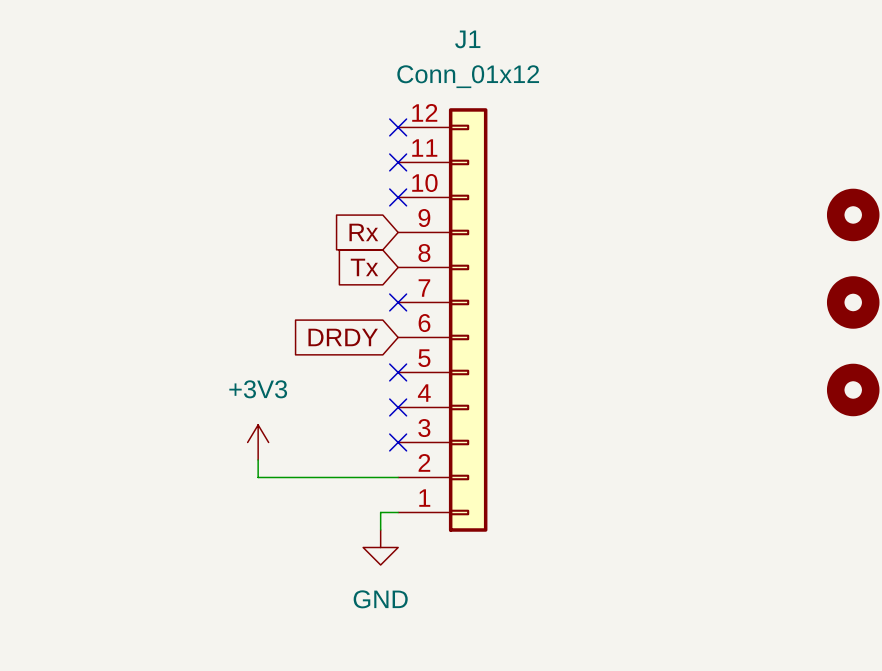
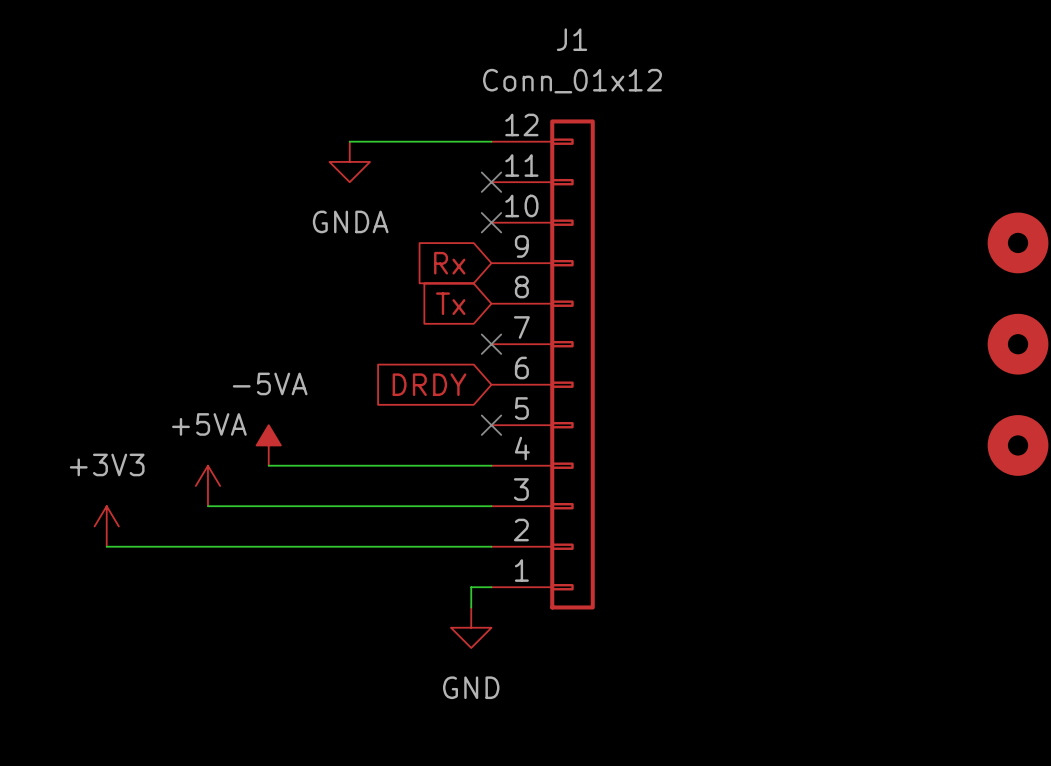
wire: none -> (349, 141) (491, 141)
no-connect mark: (398, 127) -> none
power symbol: none -> GNDA (349, 161)
power symbol: none -> -5VA (268, 445)
wire: none -> (268, 465) (491, 465)
no-connect mark: (398, 407) -> none
power symbol: none -> +5VA (207, 485)
wire: none -> (207, 506) (491, 506)
power symbol position: +3V3 (258, 442) -> +3V3 (106, 526)
no-connect mark: (398, 442) -> none
wire: (258, 459) (258, 477) -> (106, 546) (329, 546)

